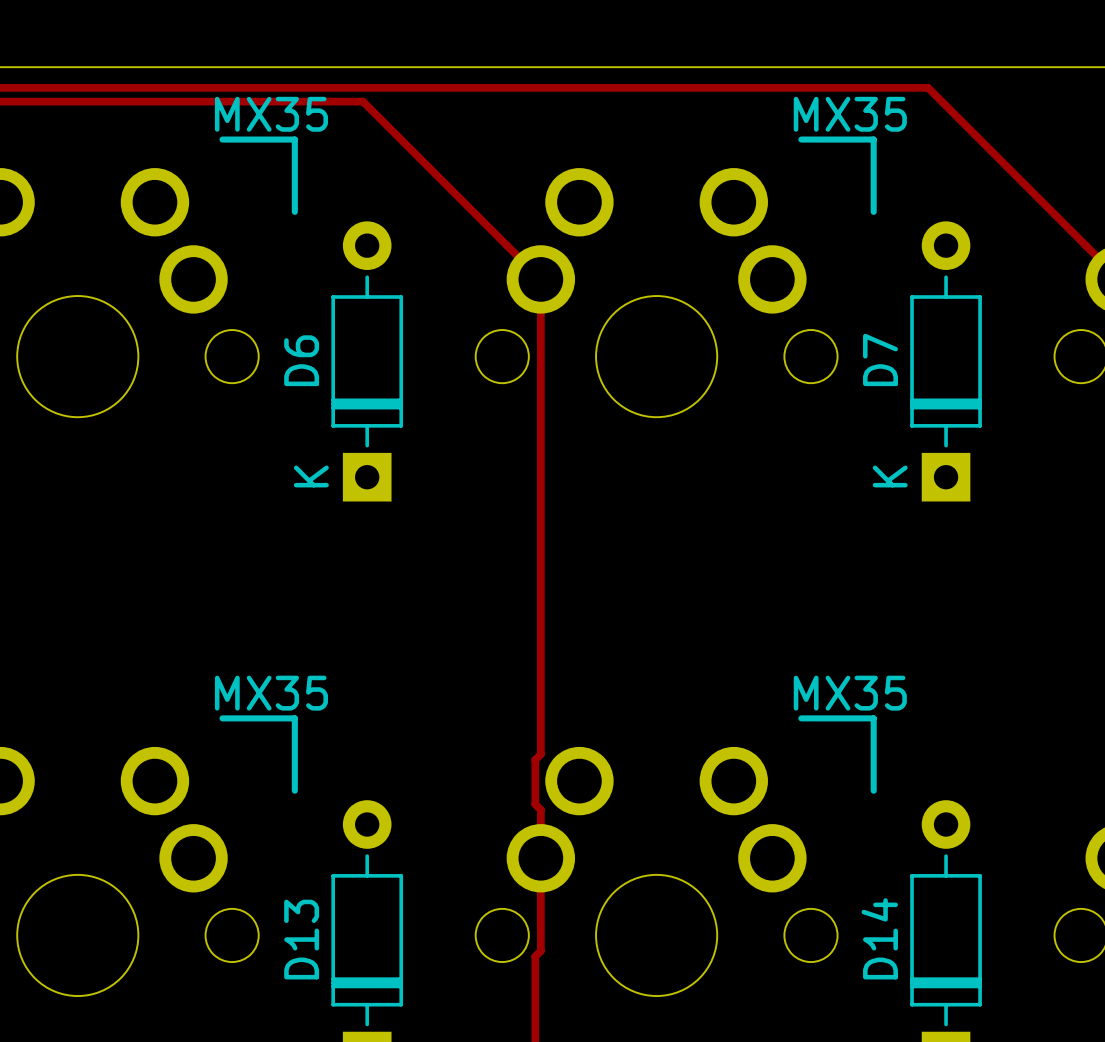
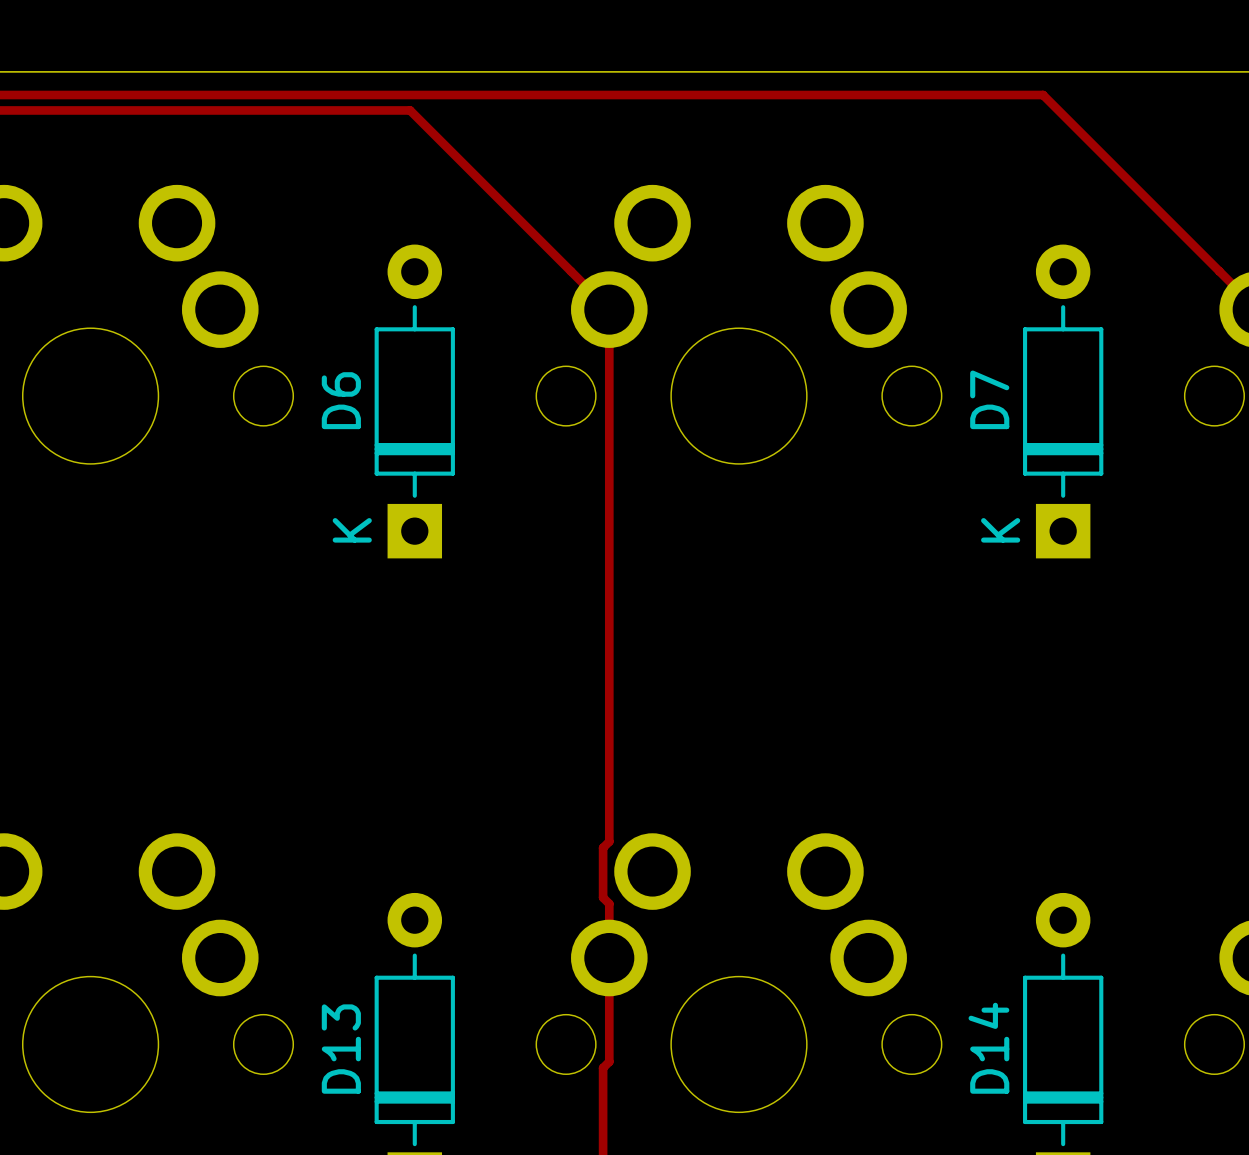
text: MX35 (271, 114) -> none
text: MX35 (850, 114) -> none
line: (222, 139) (294, 139) (294, 211) -> none
line: (801, 139) (873, 139) (873, 211) -> none
text: MX35 (271, 693) -> none
text: MX35 (850, 693) -> none
line: (222, 718) (294, 718) (294, 790) -> none
line: (801, 718) (873, 718) (873, 790) -> none

